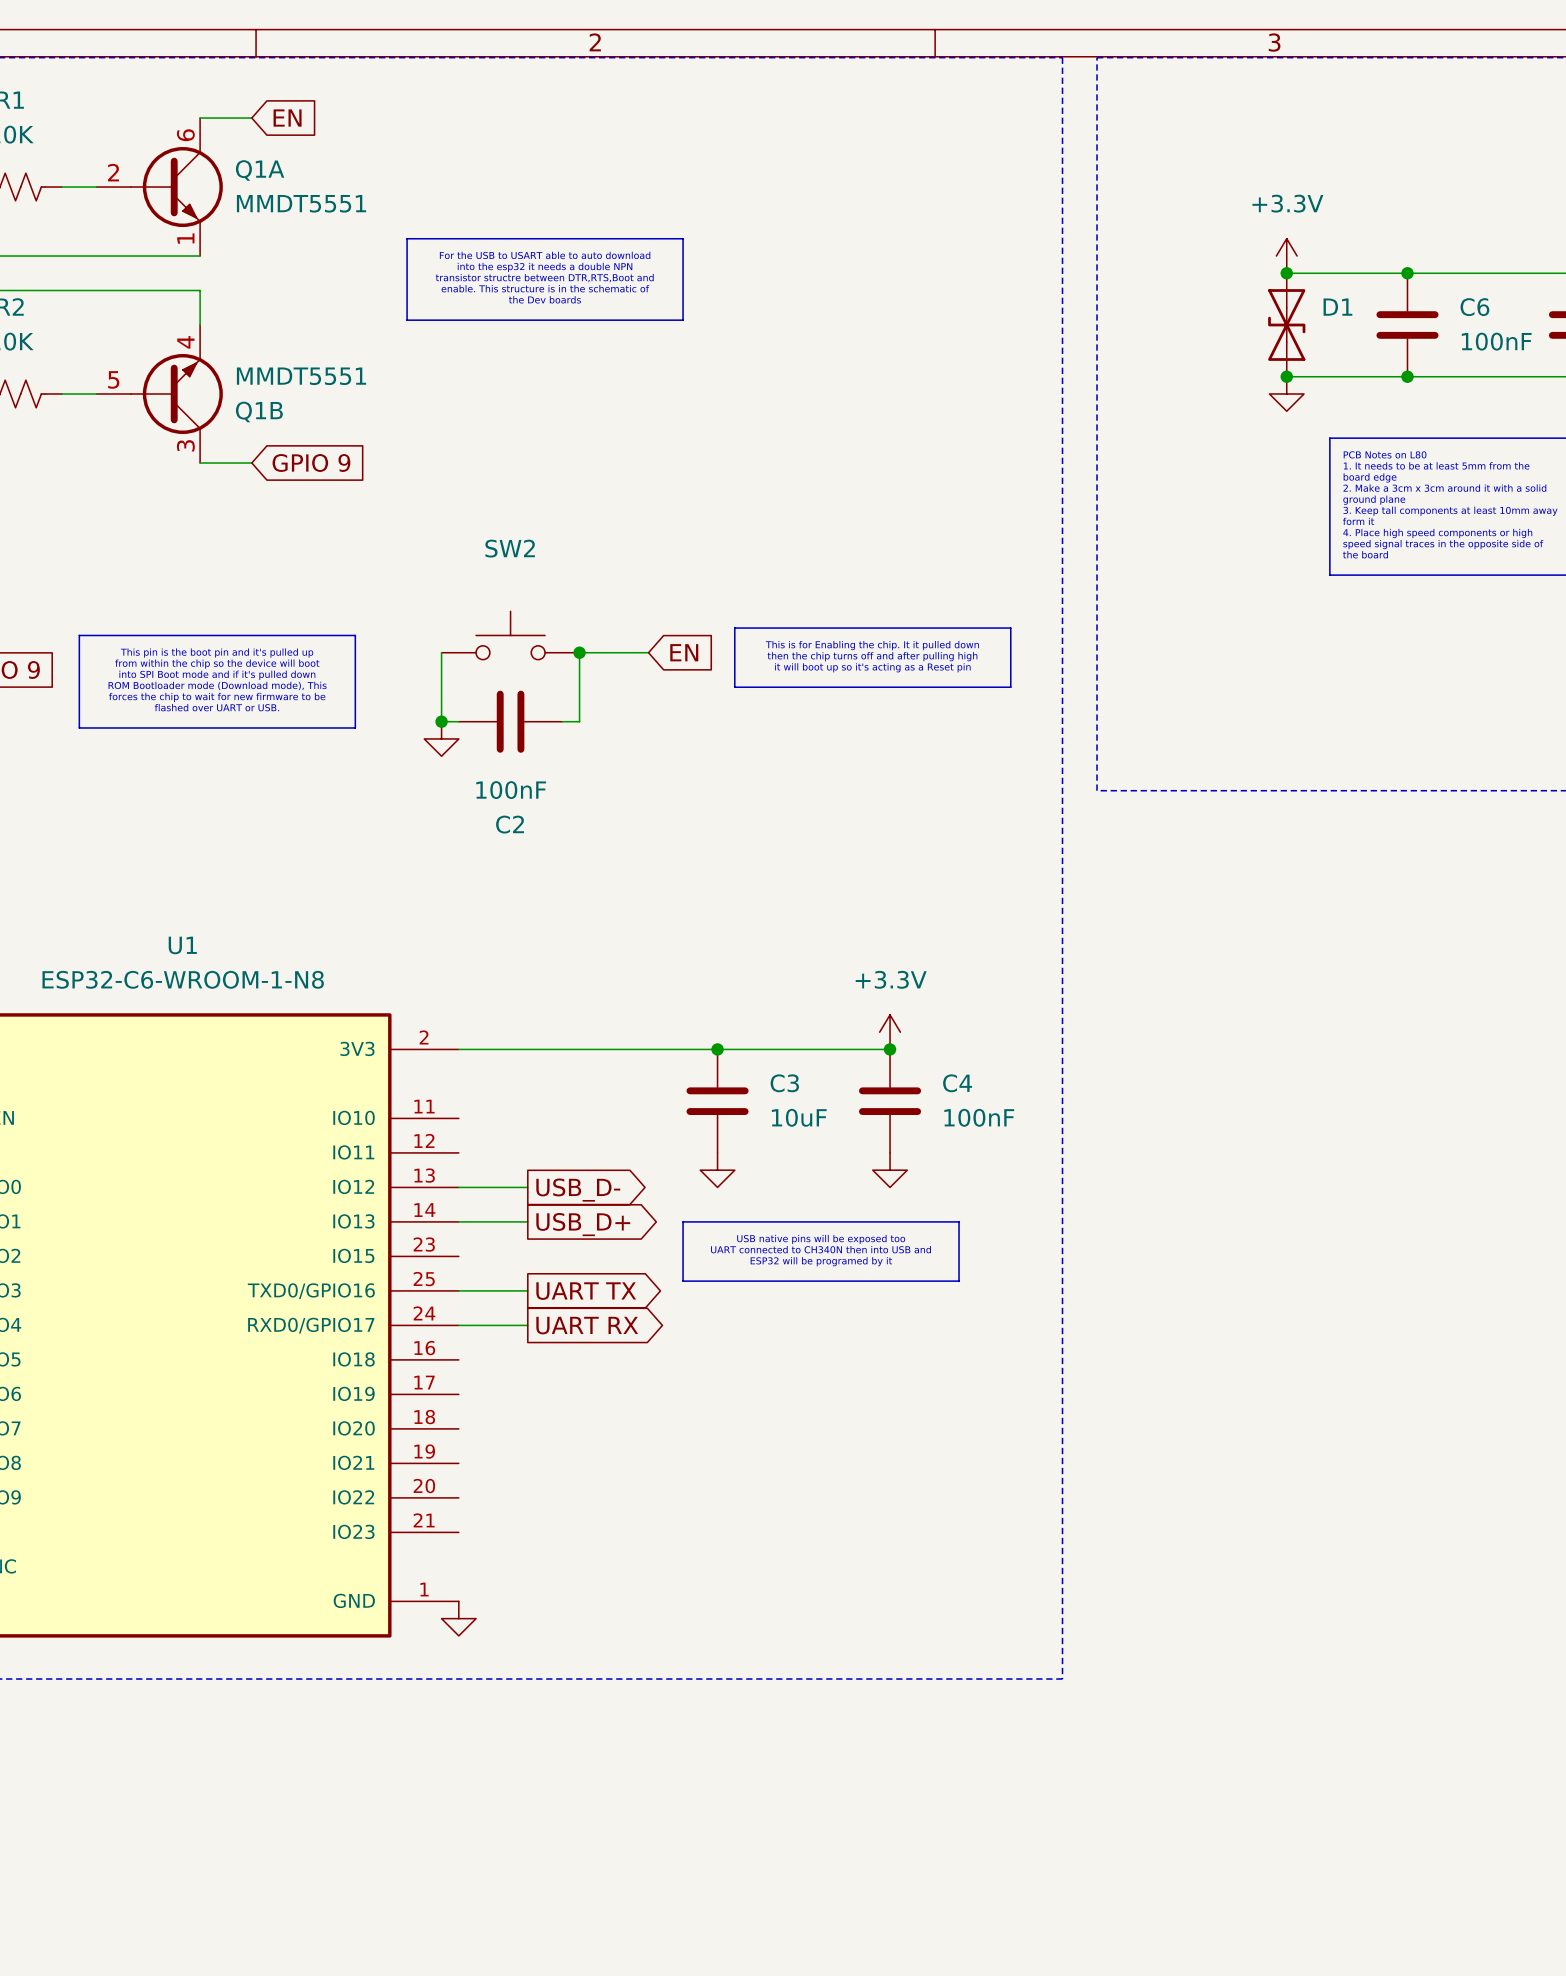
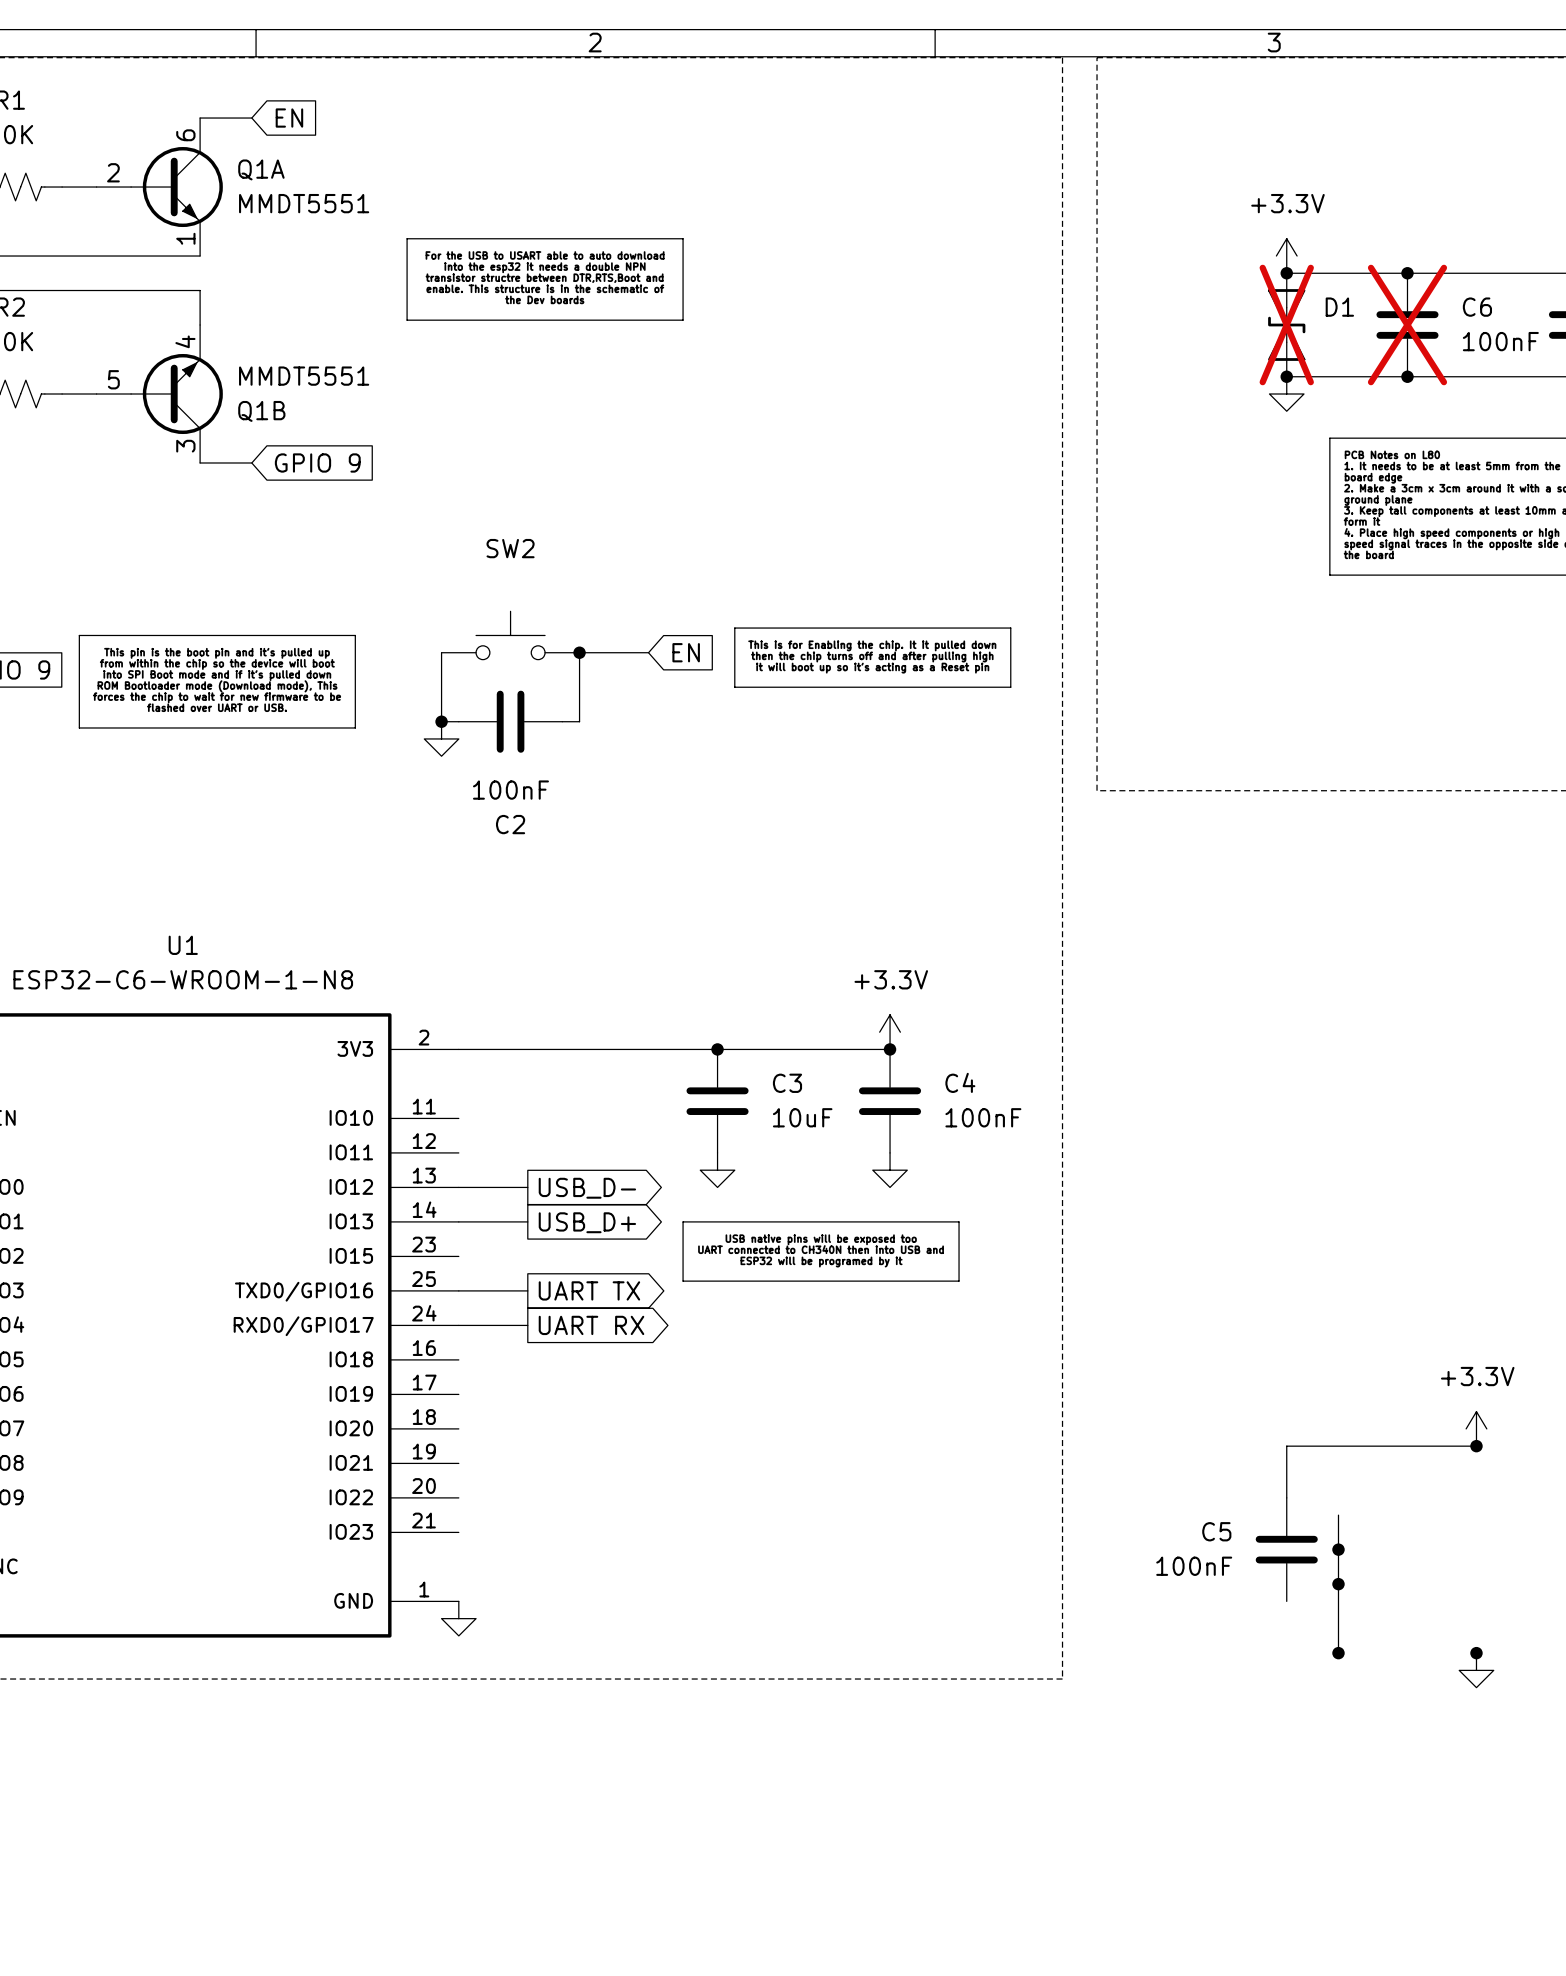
D1 do-not-place cross: none -> (1286, 325)
C6 do-not-place cross: none -> (1407, 325)
power symbol: none -> +3.3V (1476, 1428)
wire: none -> (1476, 1446) (1286, 1446) (1286, 1497)
junction: none -> (1476, 1446)
wire: none -> (1338, 1515) (1338, 1653)
C5: none -> 100nF (1286, 1549)
junction: none -> (1338, 1549)
junction: none -> (1338, 1584)
junction: none -> (1338, 1653)
junction: none -> (1476, 1653)
power symbol: none -> (1476, 1670)

